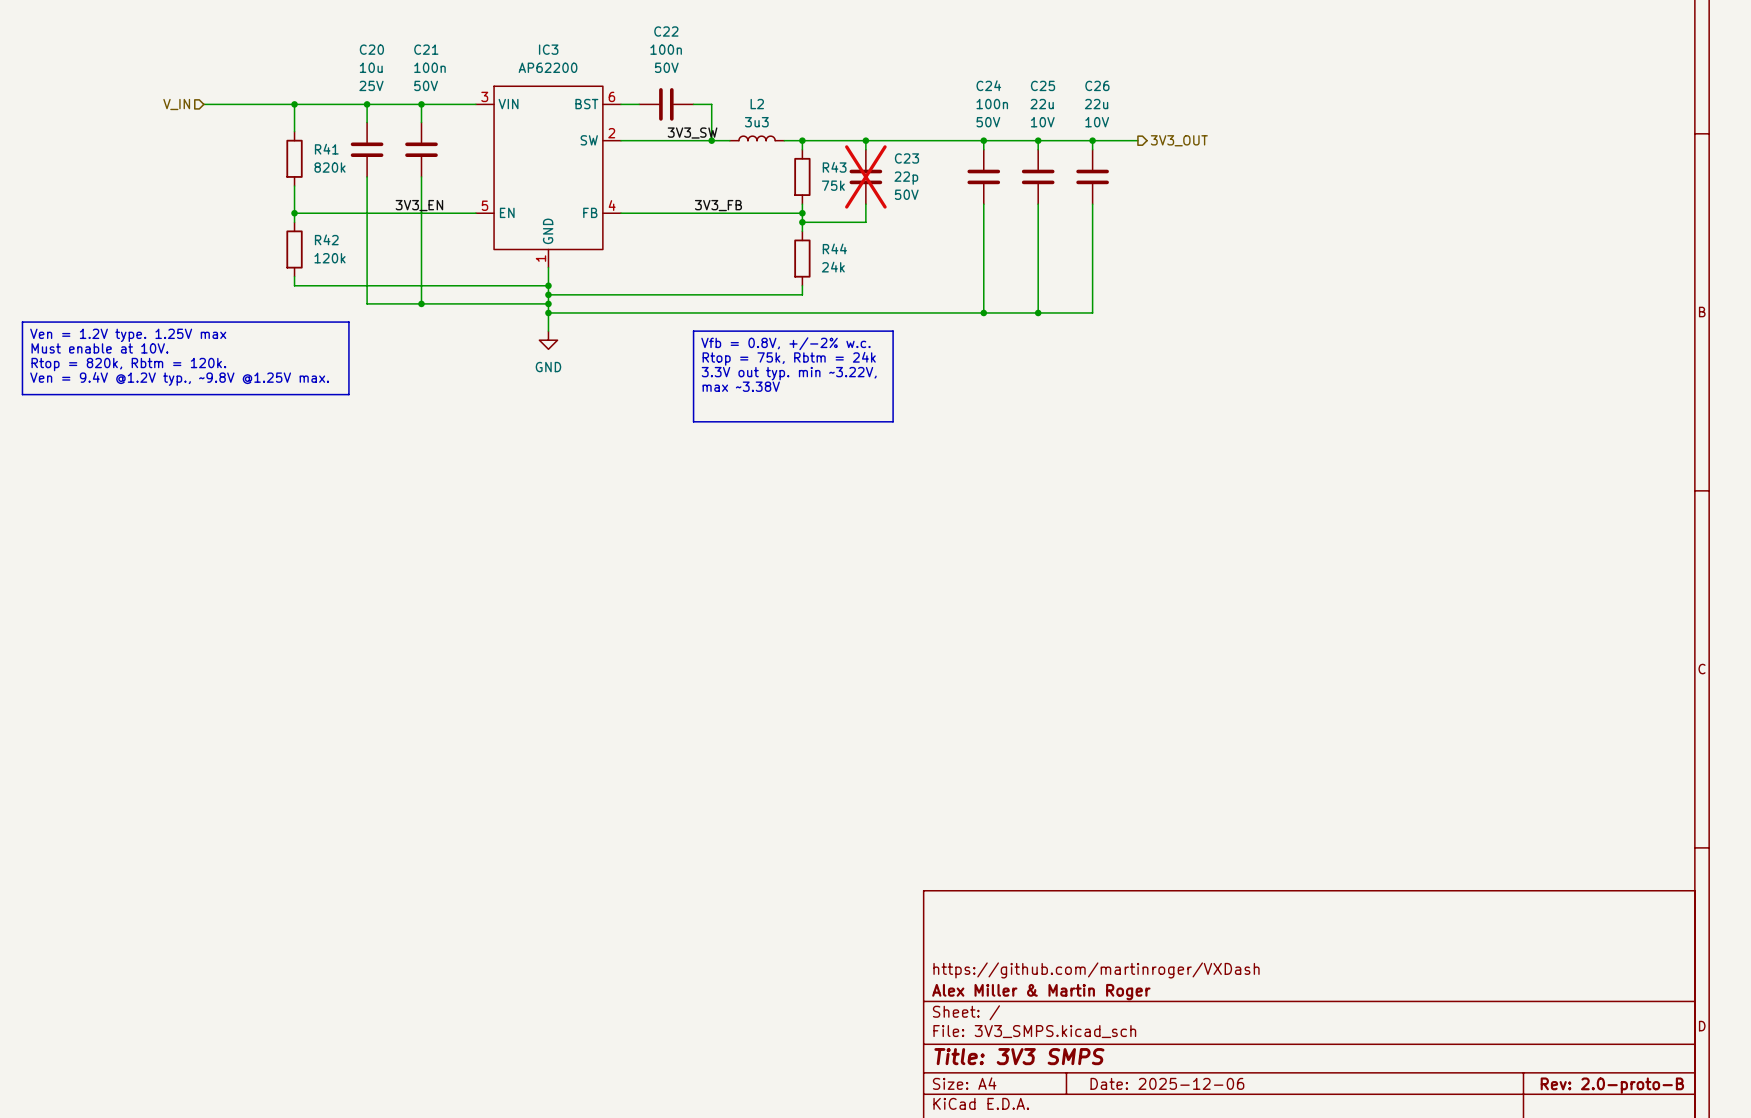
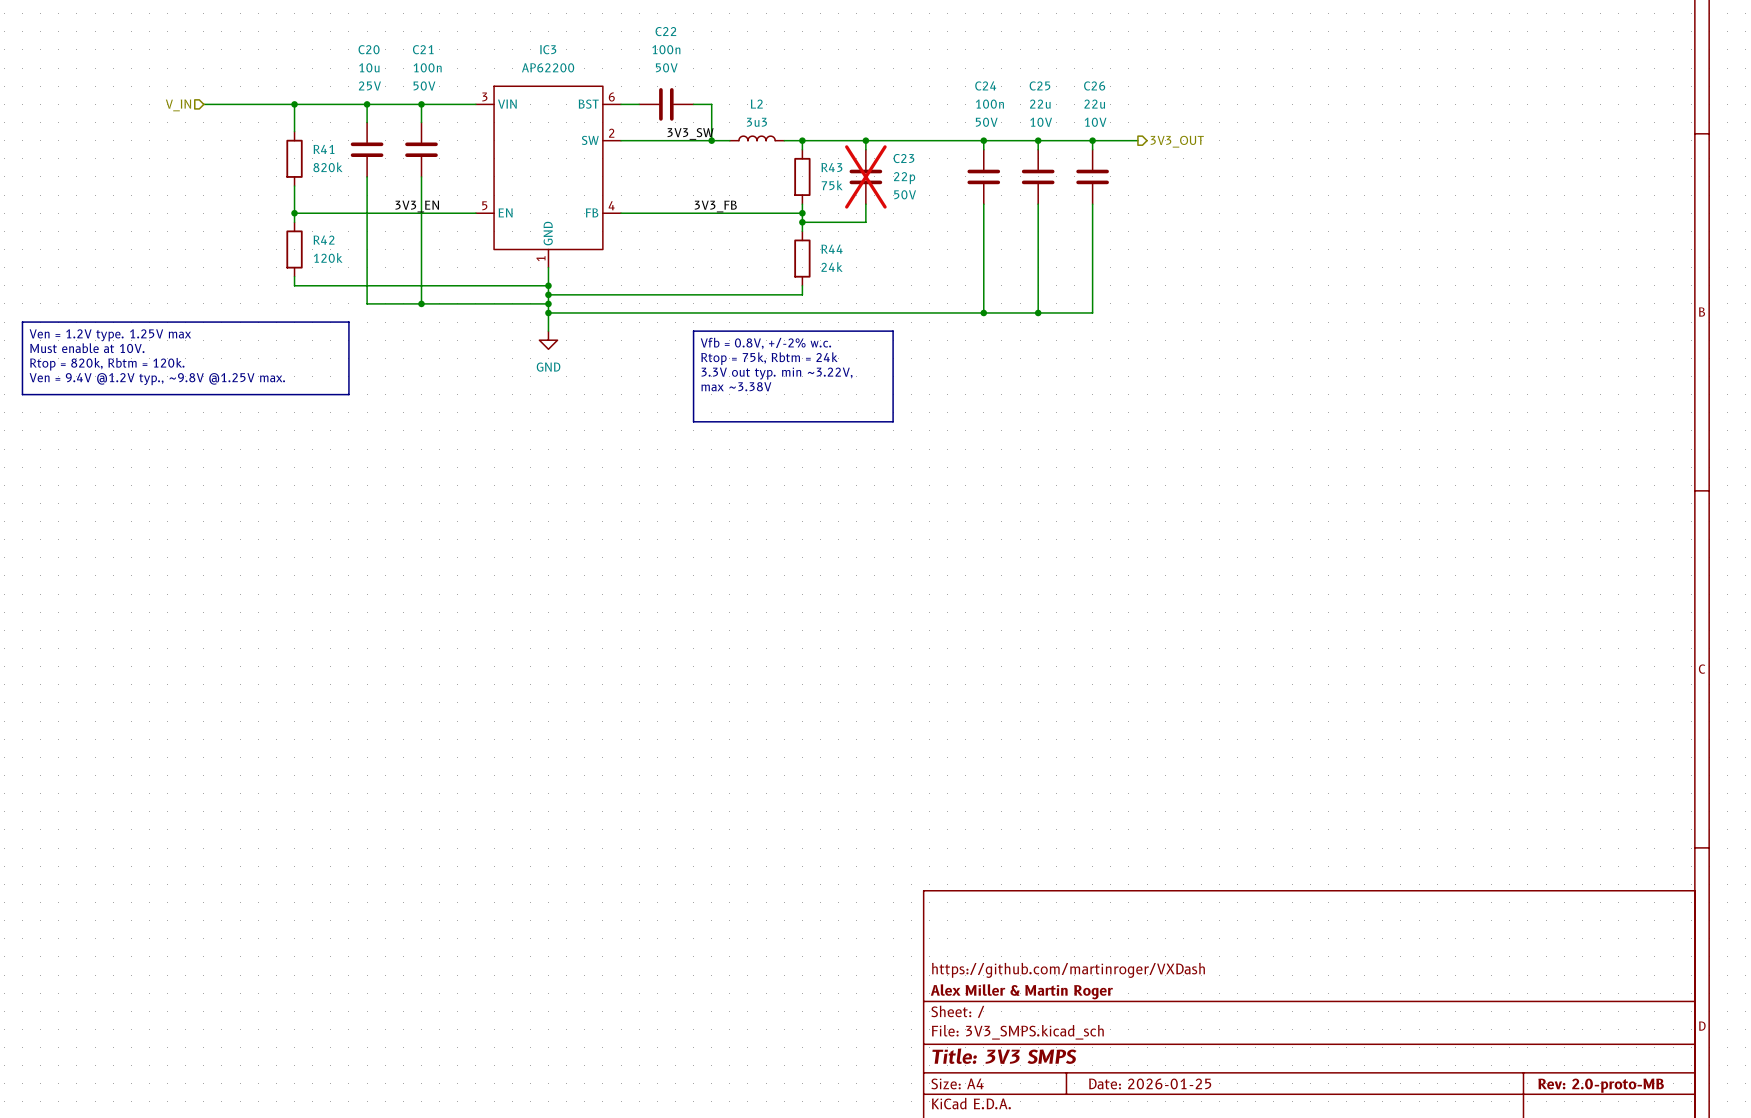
title block: Date: 2025-12-06 (1167, 1083) -> Date: 2026-01-25 (1150, 1083)
title block: Rev: 2.0-proto-B (1612, 1085) -> Rev: 2.0-proto-MB (1601, 1085)

